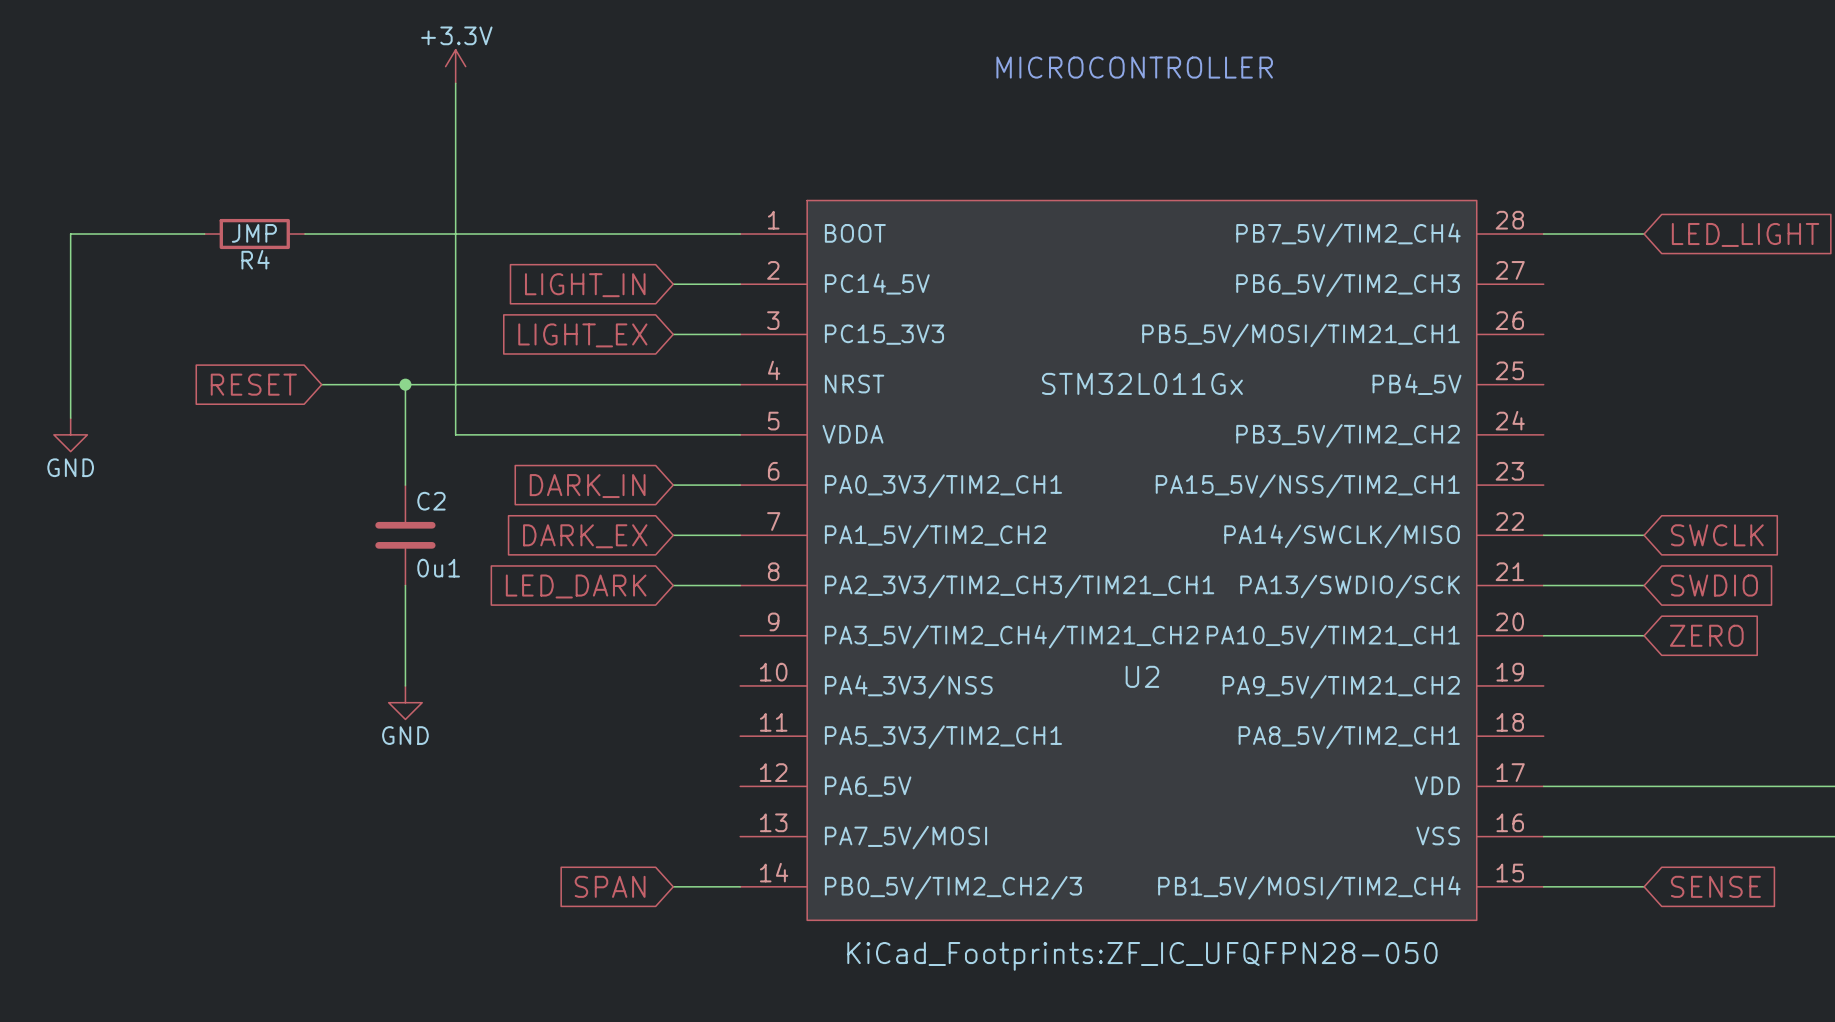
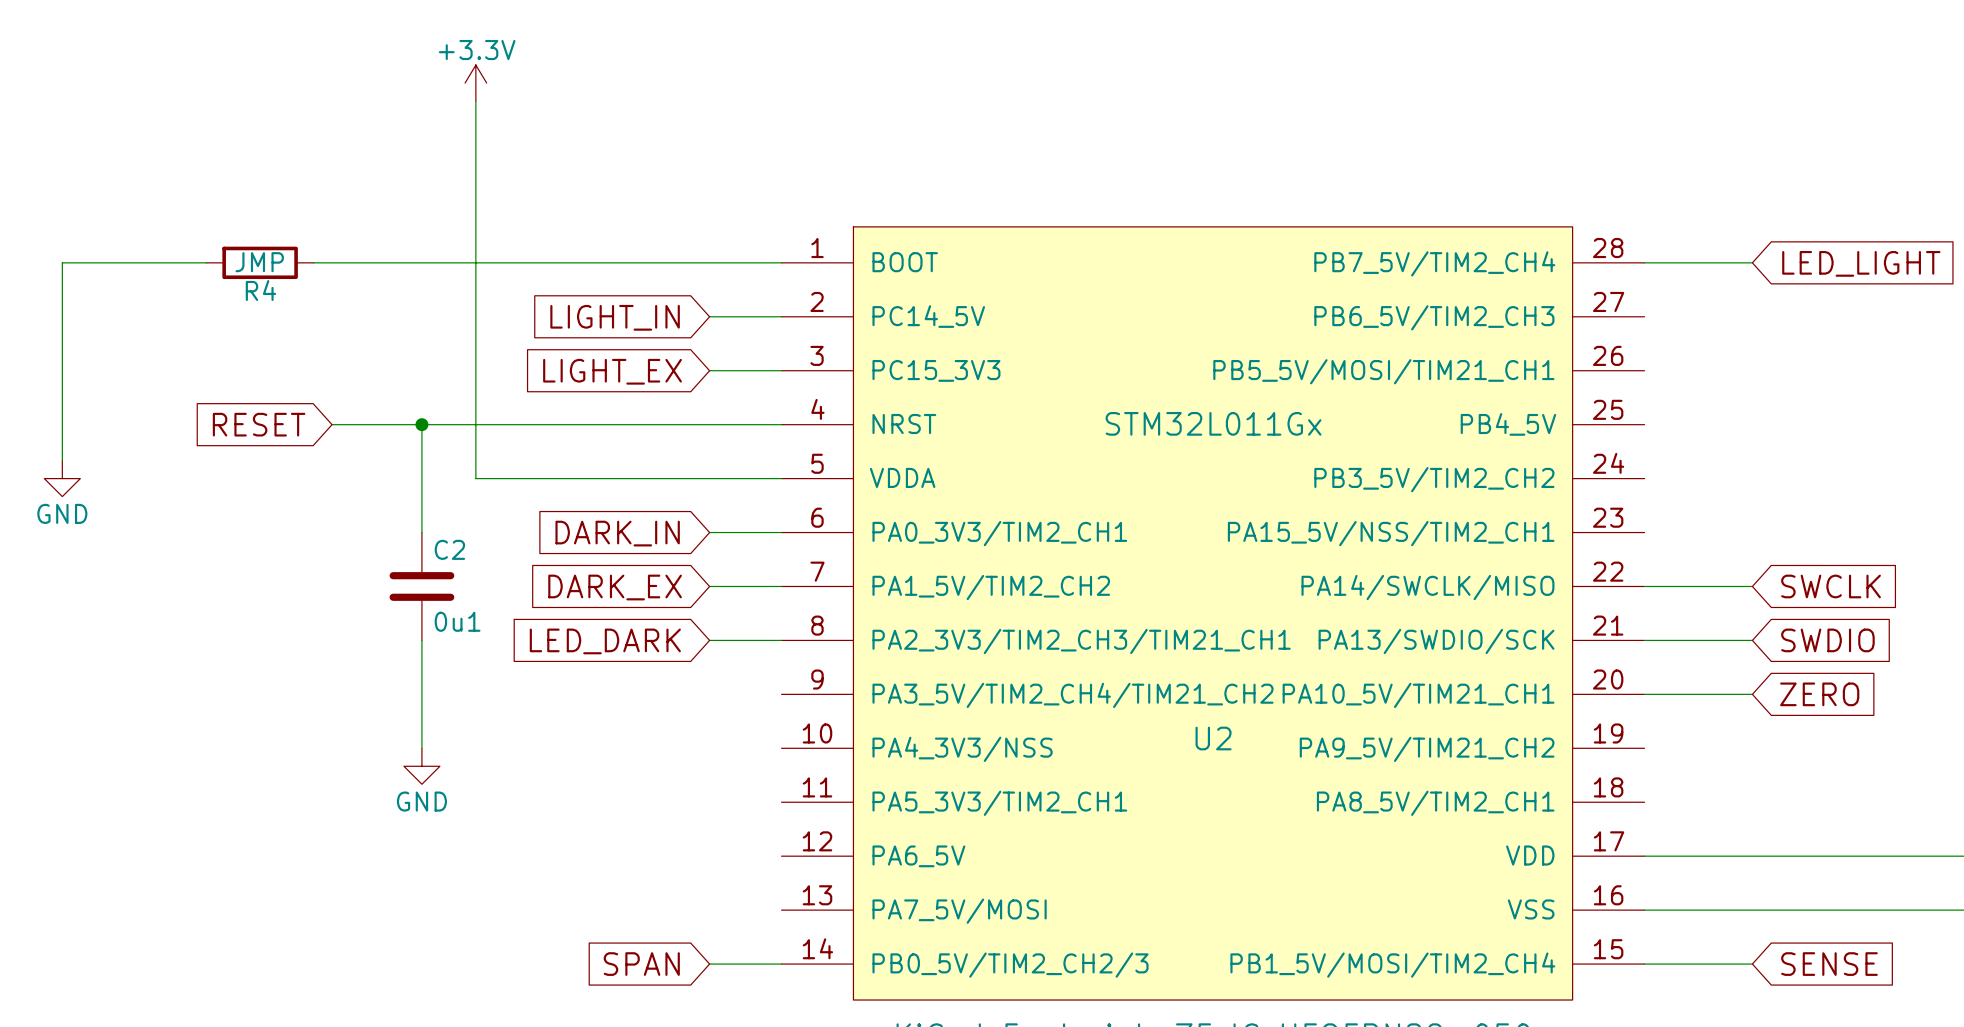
text: MICROCONTROLLER (1134, 67) -> none

